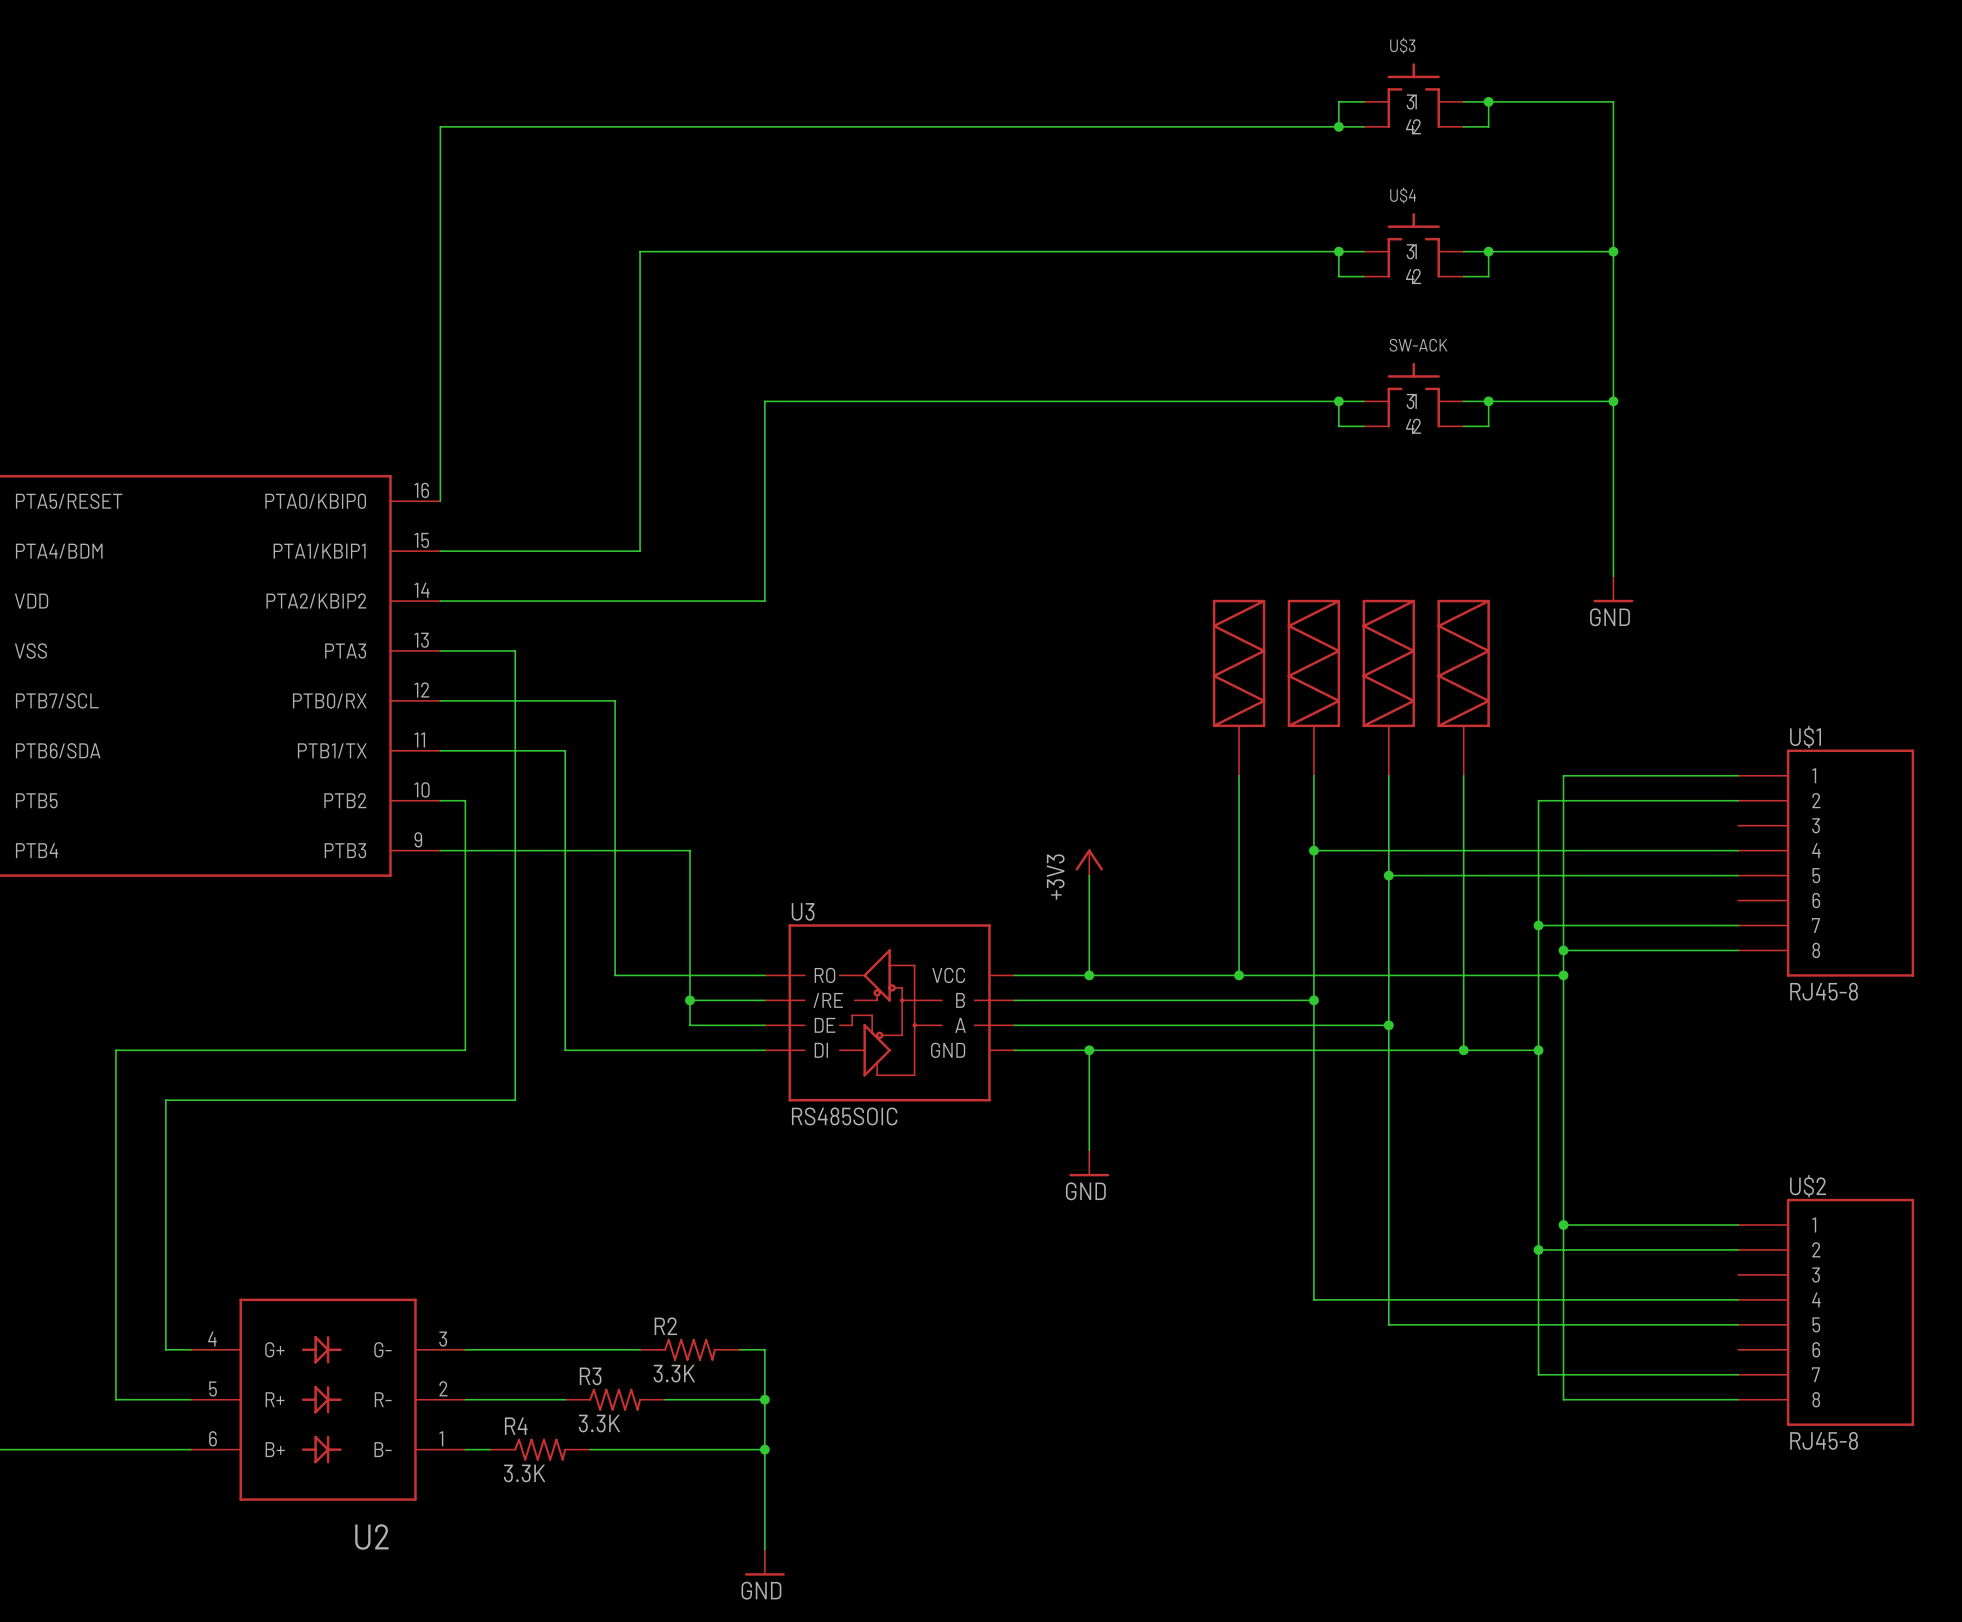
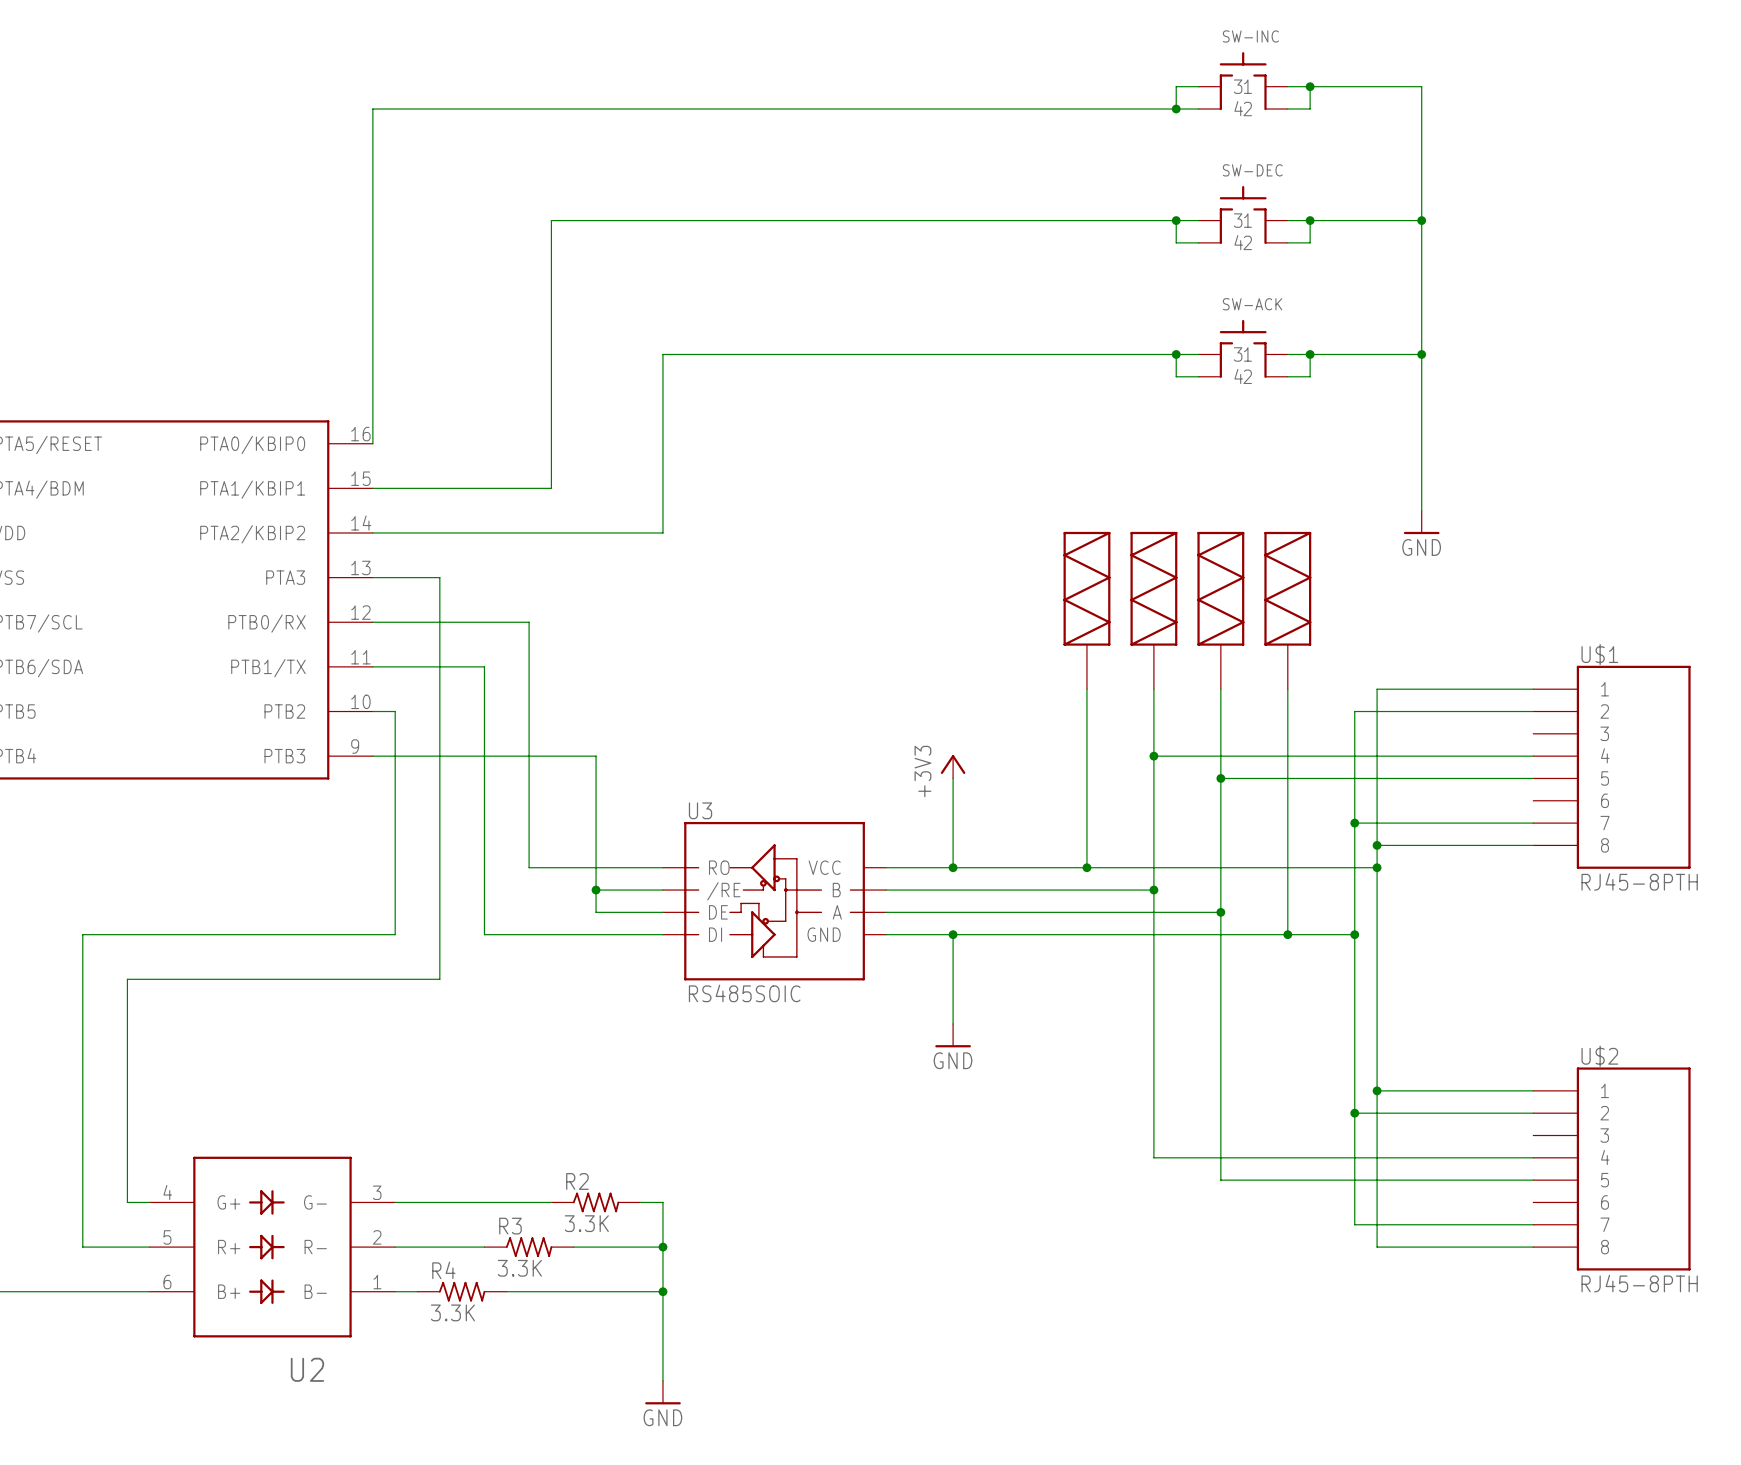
U$3 name: U$3 (1402, 45) -> SW-INC (1250, 36)
U$4 name: U$4 (1403, 195) -> SW-DEC (1252, 170)
U$1 value: RJ45-8 (1824, 991) -> RJ45-8PTH (1639, 881)
U$2 value: RJ45-8 (1824, 1440) -> RJ45-8PTH (1639, 1283)

